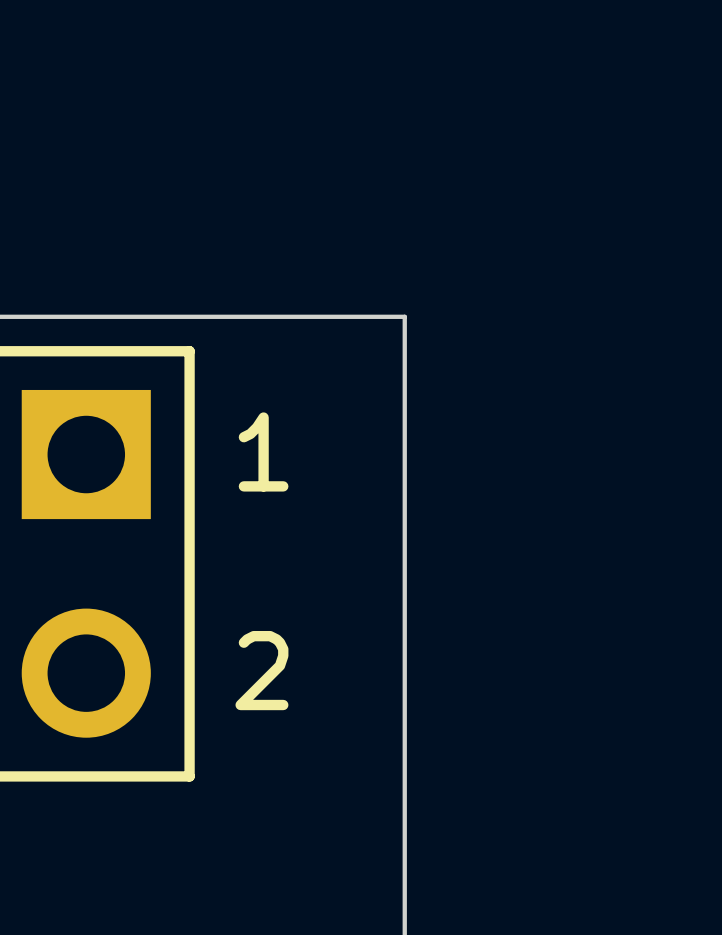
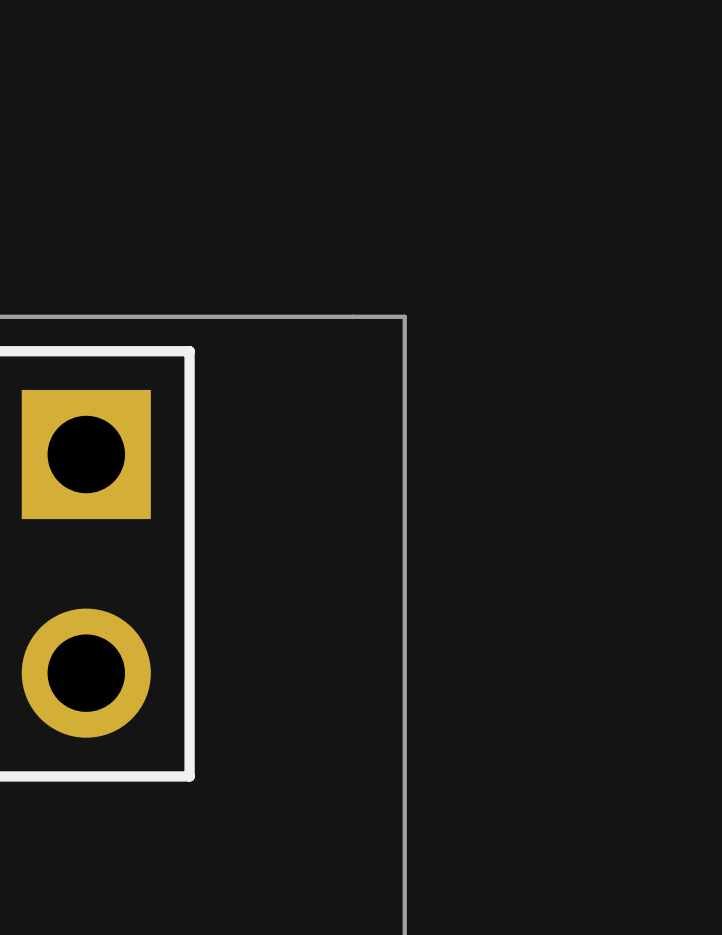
text: 1 (263, 451) -> none
text: 2 (261, 670) -> none

